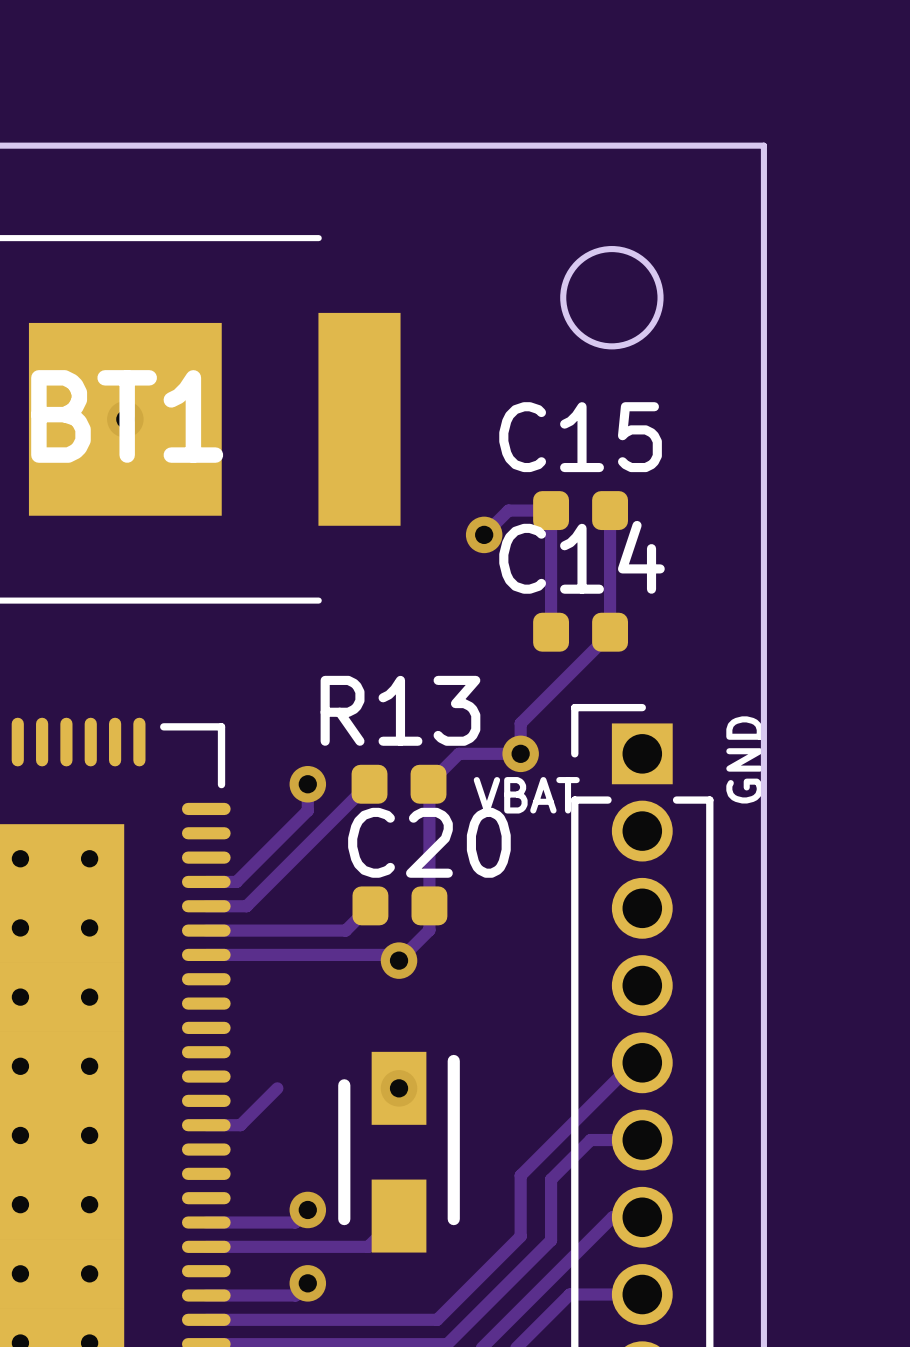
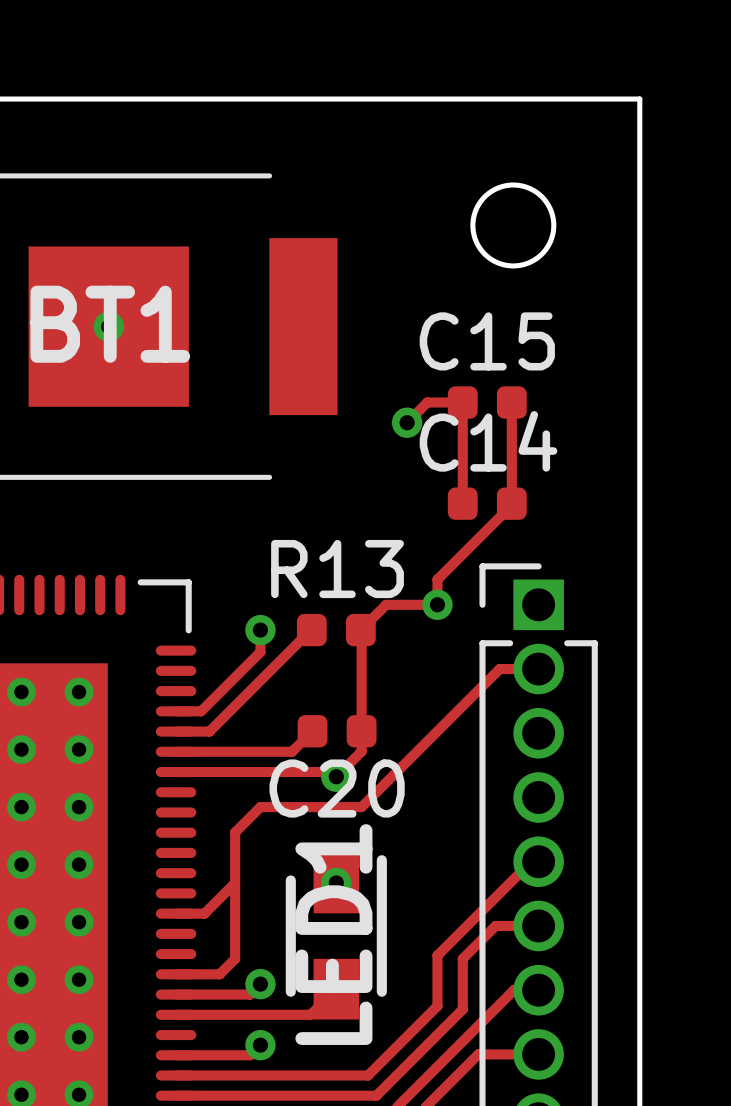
text: GND (744, 759) -> none
text: VBAT (526, 795) -> none
track: none -> (538, 669) (499, 669) (361, 807) (260, 807) (235, 832) (235, 958) (219, 974) (176, 974)
C20 name position: C20 (429, 842) -> C20 (337, 788)
LED1 name: none -> LED1 (333, 934)

